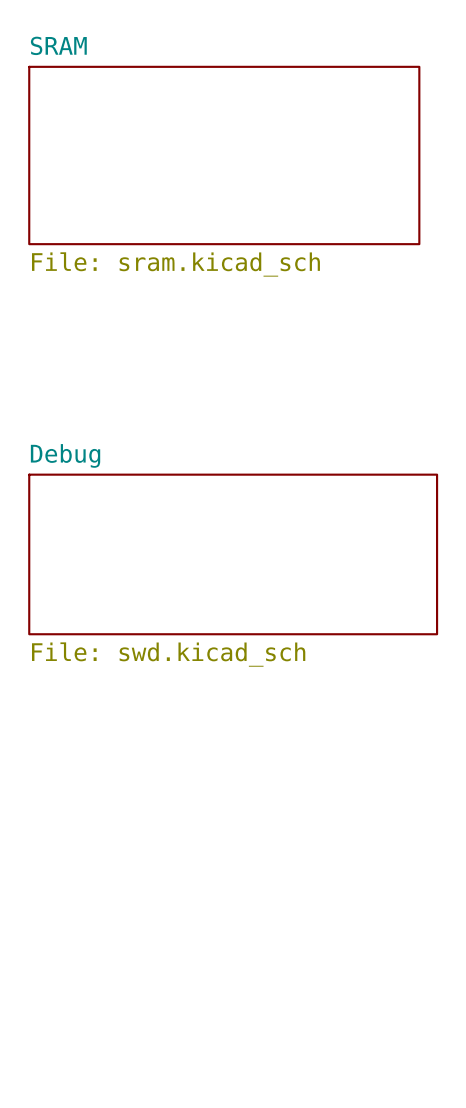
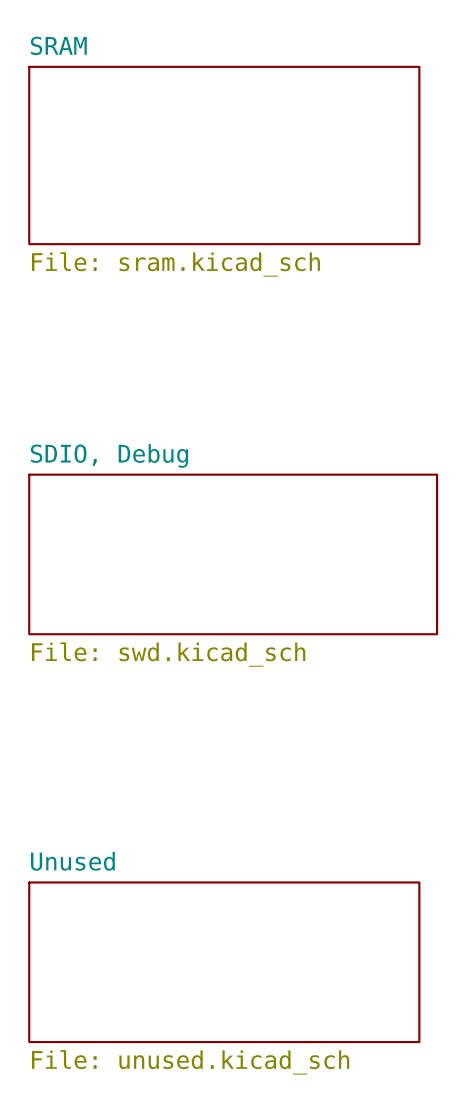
sheet Debug name: Debug (65, 455) -> SDIO, Debug (109, 455)
sheet Unused: none -> File: unused.kicad_sch (224, 962)

